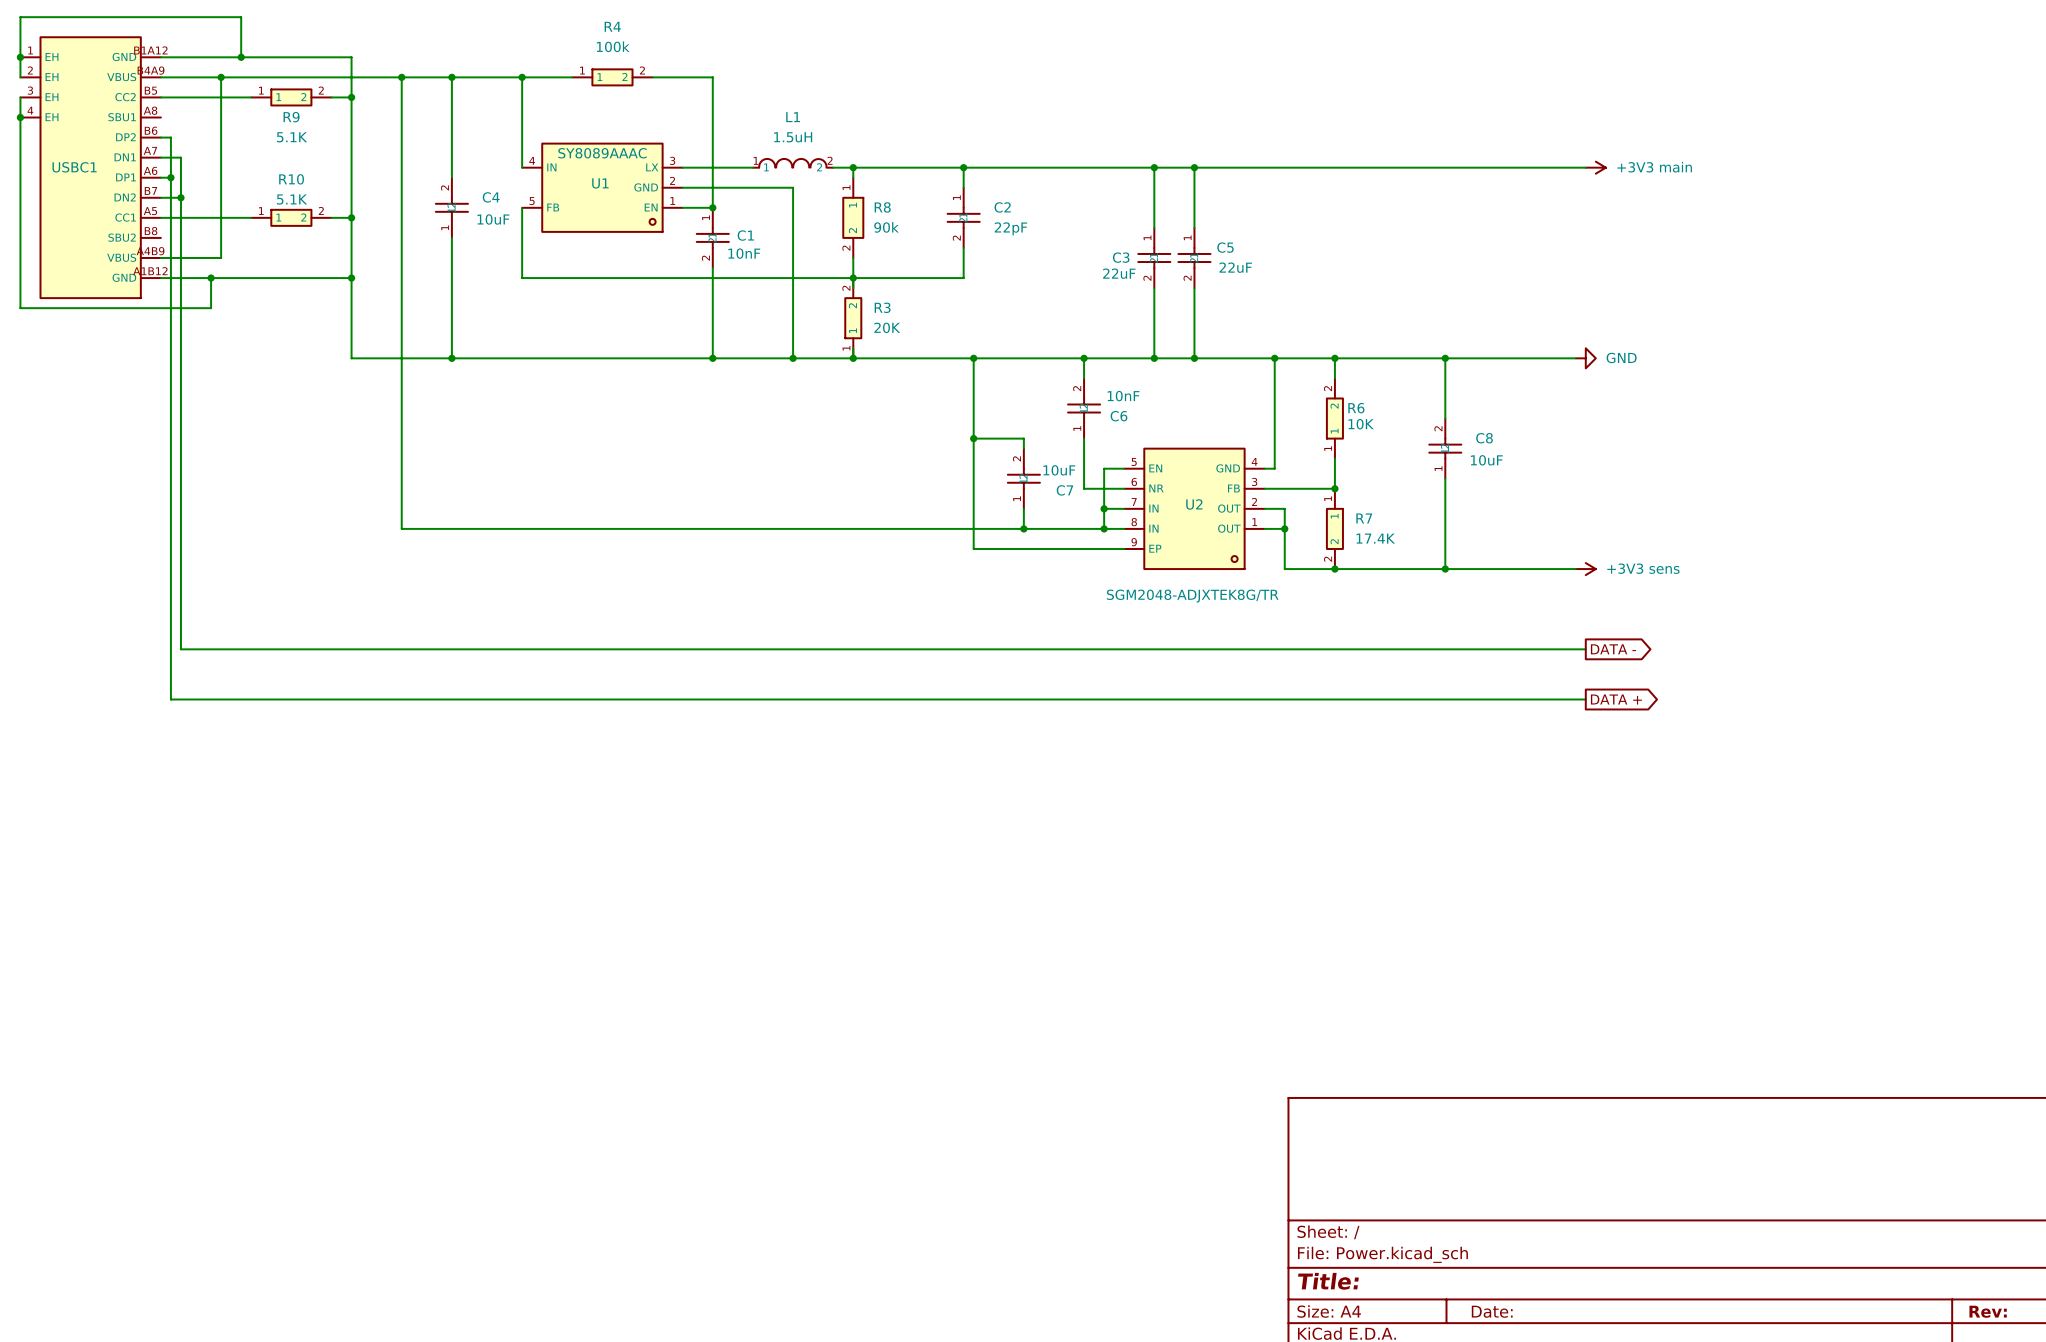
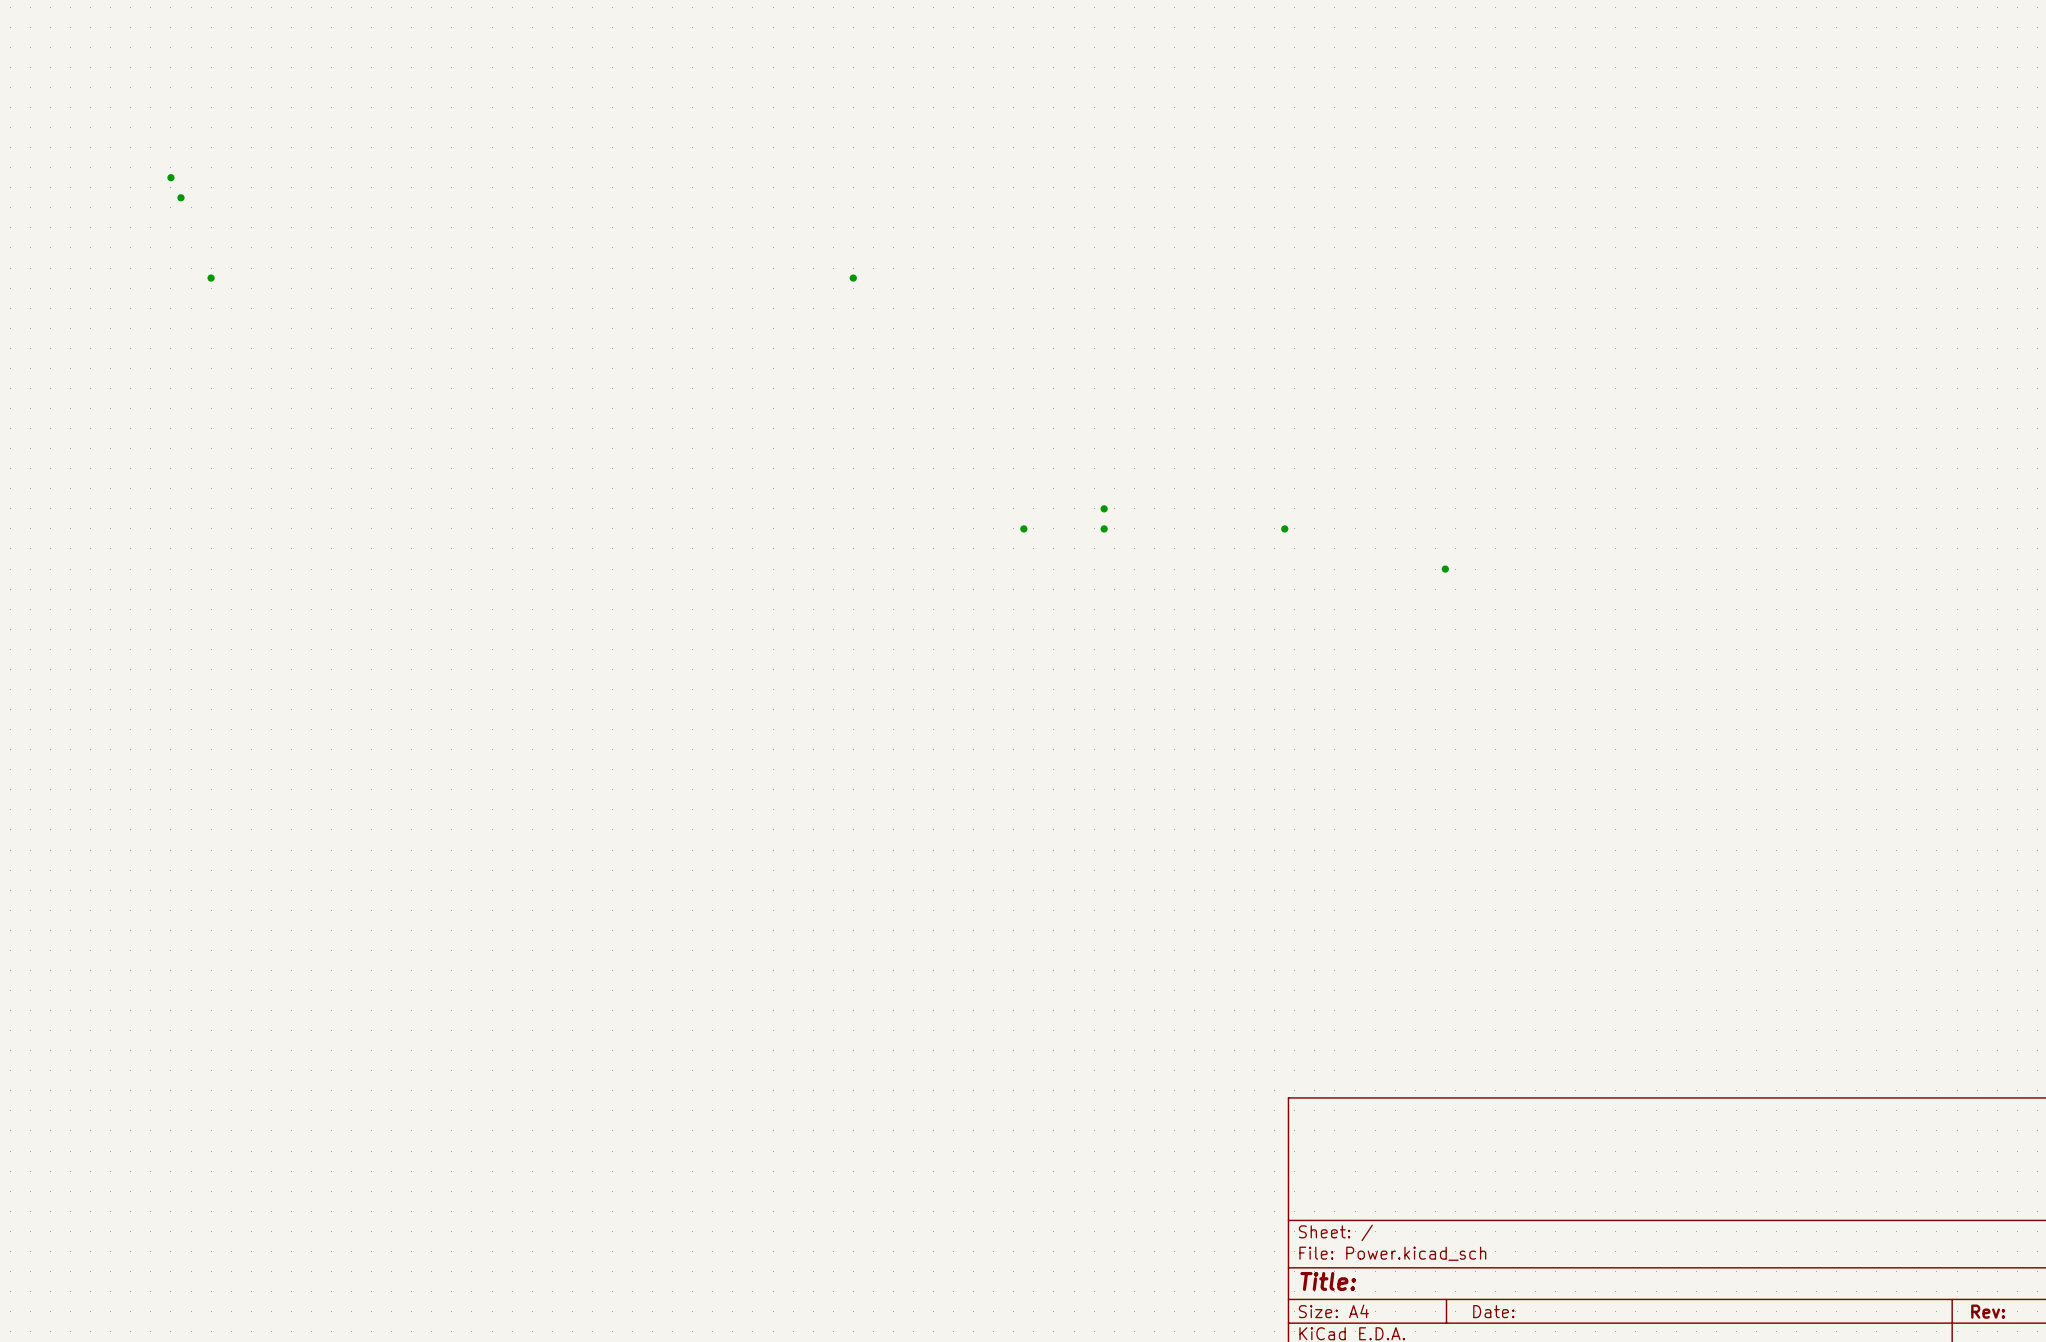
junction: (20, 57) -> none
wire: (160, 57) (351, 57) (351, 358) (1575, 358) -> none
wire: (241, 57) (241, 17) (20, 17) (20, 77) -> none
junction: (241, 57) -> none
wire: (160, 77) (572, 77) -> none
wire: (221, 77) (221, 257) (160, 257) -> none
junction: (221, 77) -> none
wire: (401, 77) (401, 528) (1124, 528) -> none
junction: (401, 77) -> none
wire: (451, 77) (451, 177) -> none
junction: (451, 77) -> none
wire: (522, 77) (522, 167) -> none
junction: (522, 77) -> none
R4: 100k (612, 77) -> none
wire: (652, 77) (712, 77) (712, 207) (682, 207) -> none
wire: (20, 97) (20, 308) (211, 308) (211, 278) -> none
wire: (160, 97) (251, 97) -> none
R9: 5.1K (291, 97) -> none
wire: (331, 97) (351, 97) -> none
junction: (351, 97) -> none
junction: (20, 117) -> none
wire: (160, 137) (170, 137) (170, 699) (1585, 699) -> none
wire: (160, 157) (180, 157) (180, 649) (1585, 649) -> none
L1: 1.5uH (793, 163) -> none
USBC1: (90, 167) -> none
wire: (682, 167) (752, 167) -> none
wire: (833, 167) (1585, 167) -> none
wire: (853, 167) (853, 177) -> none
junction: (853, 167) -> none
wire: (963, 167) (963, 187) -> none
junction: (963, 167) -> none
wire: (1154, 167) (1154, 227) -> none
junction: (1154, 167) -> none
wire: (1194, 167) (1194, 227) -> none
junction: (1194, 167) -> none
power symbol: +3V3 main (1595, 167) -> none
wire: (160, 177) (170, 177) -> none
U1: SY8089AAAC (602, 187) -> none
wire: (682, 187) (793, 187) (793, 358) -> none
wire: (160, 197) (180, 197) -> none
C4: 10uF (451, 207) -> none
wire: (522, 207) (522, 278) (963, 278) (963, 247) -> none
junction: (712, 207) -> none
wire: (160, 217) (251, 217) -> none
R10: 5.1K (291, 217) -> none
wire: (331, 217) (351, 217) -> none
junction: (351, 217) -> none
R8: 90k (853, 217) -> none
C2: 22pF (963, 217) -> none
wire: (451, 237) (451, 358) -> none
C1: 10nF (712, 237) -> none
wire: (853, 257) (853, 288) -> none
C3: 22uF (1154, 257) -> none
C5: 22uF (1194, 257) -> none
wire: (712, 268) (712, 358) -> none
wire: (160, 278) (351, 278) -> none
junction: (351, 278) -> none
wire: (1154, 288) (1154, 358) -> none
wire: (1194, 288) (1194, 358) -> none
R3: 20K (853, 318) -> none
wire: (853, 348) (853, 358) -> none
junction: (451, 358) -> none
junction: (712, 358) -> none
junction: (793, 358) -> none
junction: (853, 358) -> none
wire: (973, 358) (973, 548) (1124, 548) -> none
junction: (973, 358) -> none
wire: (1084, 358) (1084, 378) -> none
junction: (1084, 358) -> none
junction: (1154, 358) -> none
junction: (1194, 358) -> none
wire: (1274, 358) (1274, 468) (1264, 468) -> none
junction: (1274, 358) -> none
wire: (1334, 358) (1334, 378) -> none
junction: (1334, 358) -> none
wire: (1445, 358) (1445, 418) -> none
junction: (1445, 358) -> none
power symbol: GND (1585, 358) -> none
C6: 10nF (1084, 408) -> none
R6: 10K (1334, 418) -> none
wire: (973, 438) (1023, 438) (1023, 448) -> none
junction: (973, 438) -> none
wire: (1084, 438) (1084, 488) (1124, 488) -> none
C8: 10uF (1445, 448) -> none
wire: (1334, 458) (1334, 488) (1264, 488) -> none
wire: (1124, 468) (1104, 468) (1104, 528) -> none
C7: 10uF (1023, 478) -> none
wire: (1445, 478) (1445, 569) -> none
junction: (1334, 488) -> none
wire: (1023, 508) (1023, 528) -> none
wire: (1104, 508) (1124, 508) -> none
U2: SGM2048-ADJXTEK8G/TR (1194, 508) -> none
wire: (1264, 508) (1284, 508) (1284, 569) (1575, 569) -> none
wire: (1264, 528) (1284, 528) -> none
R7: 17.4K (1334, 528) -> none
junction: (1334, 569) -> none
power symbol: +3V3 sens (1585, 569) -> none
global label: DATA - (1613, 649) -> none
global label: DATA + (1616, 699) -> none

